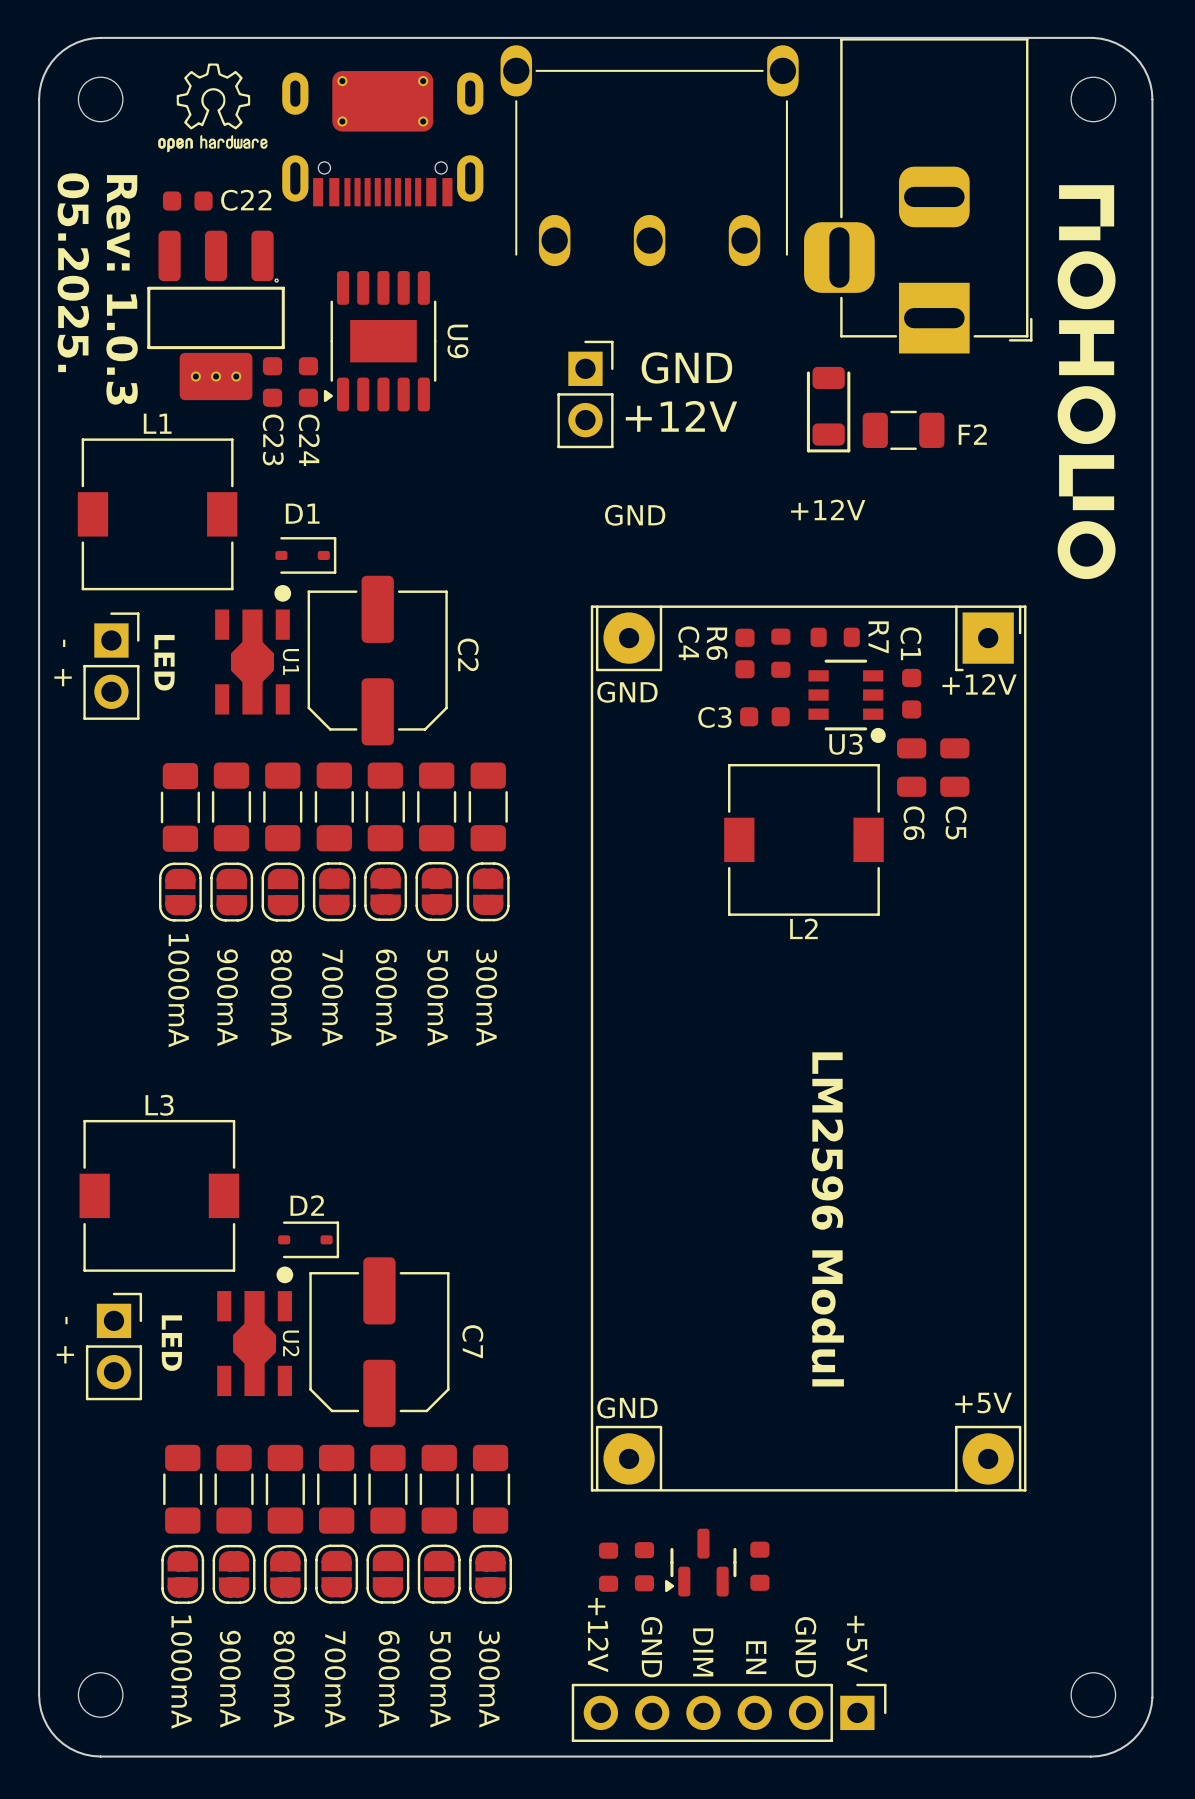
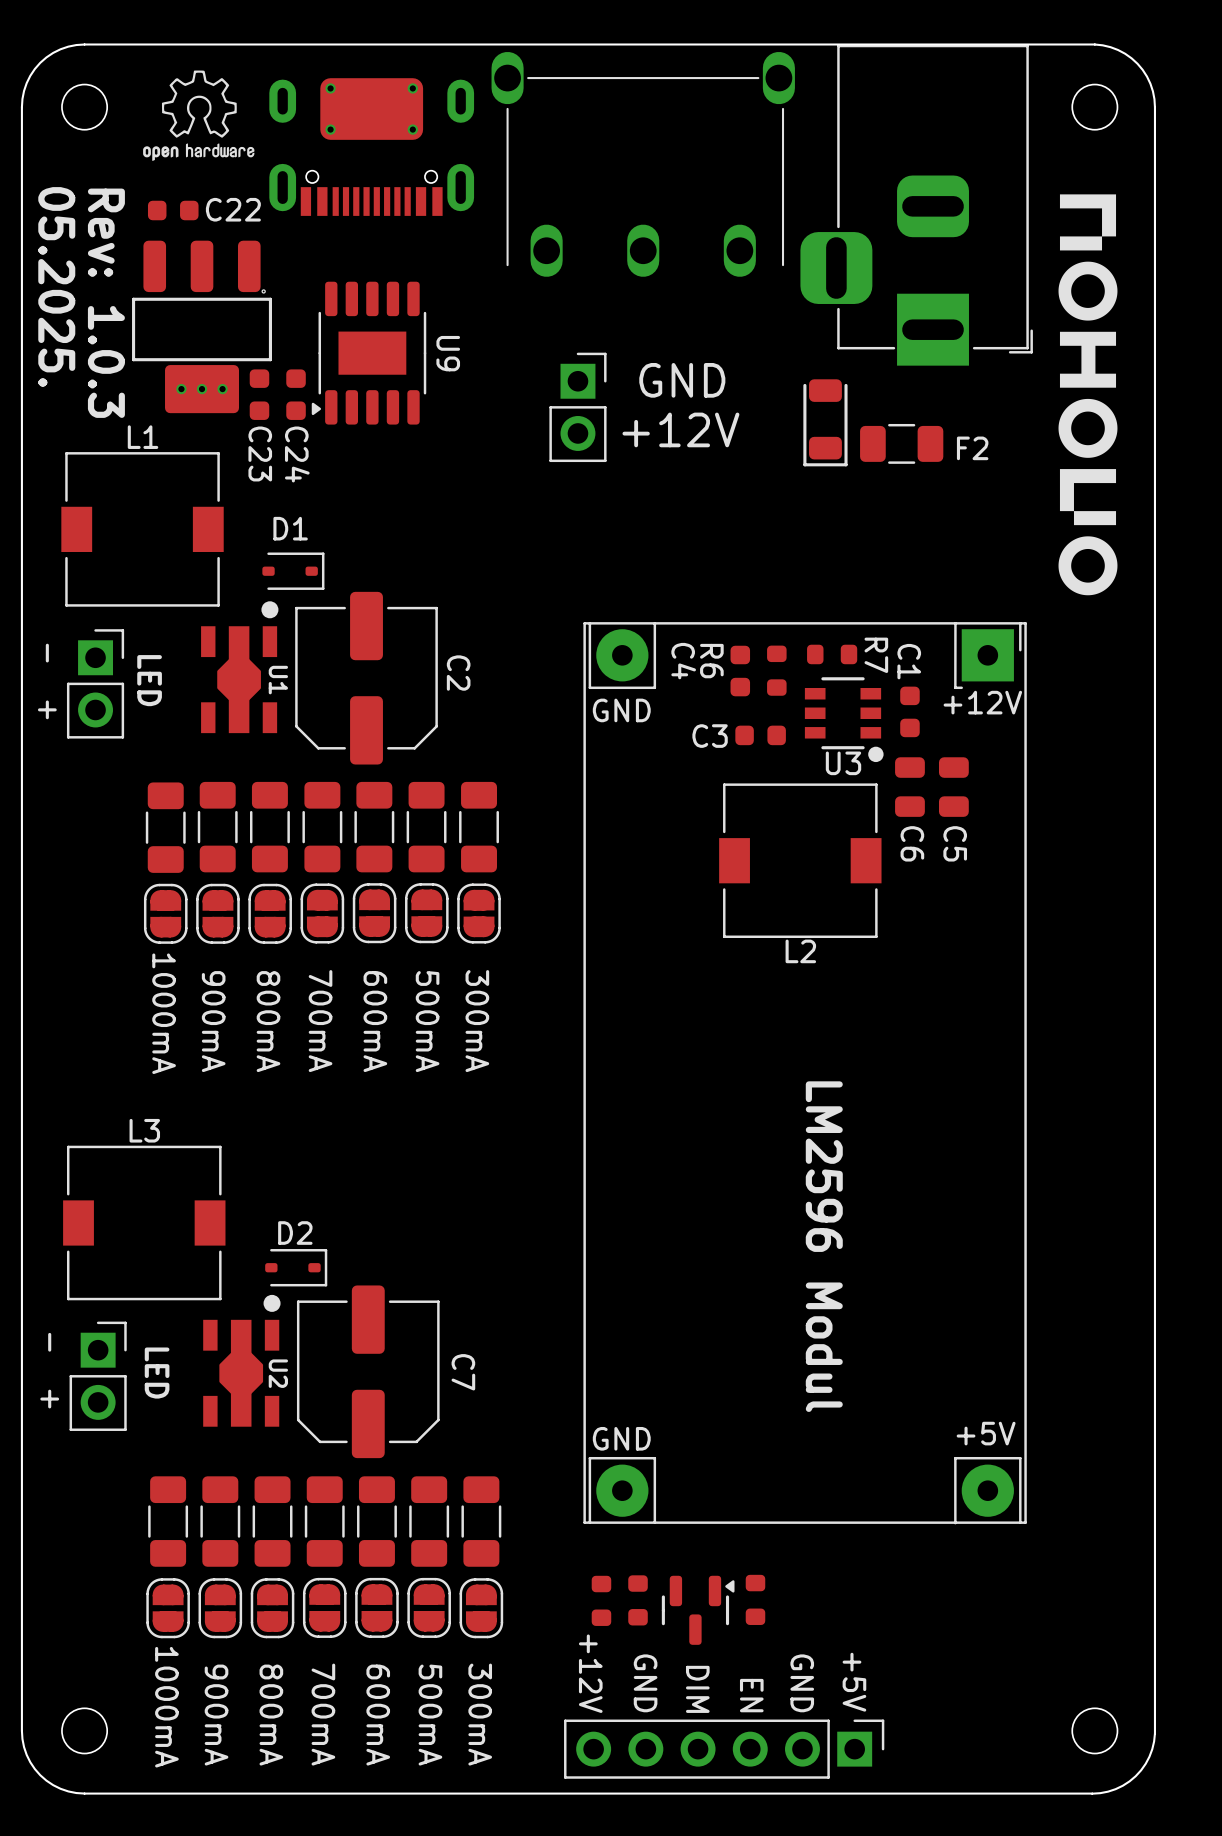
text: +12V (828, 509) -> none
text: GND (635, 515) -> none
part rotation: 0° (700, 1562) -> 180° (698, 1610)

